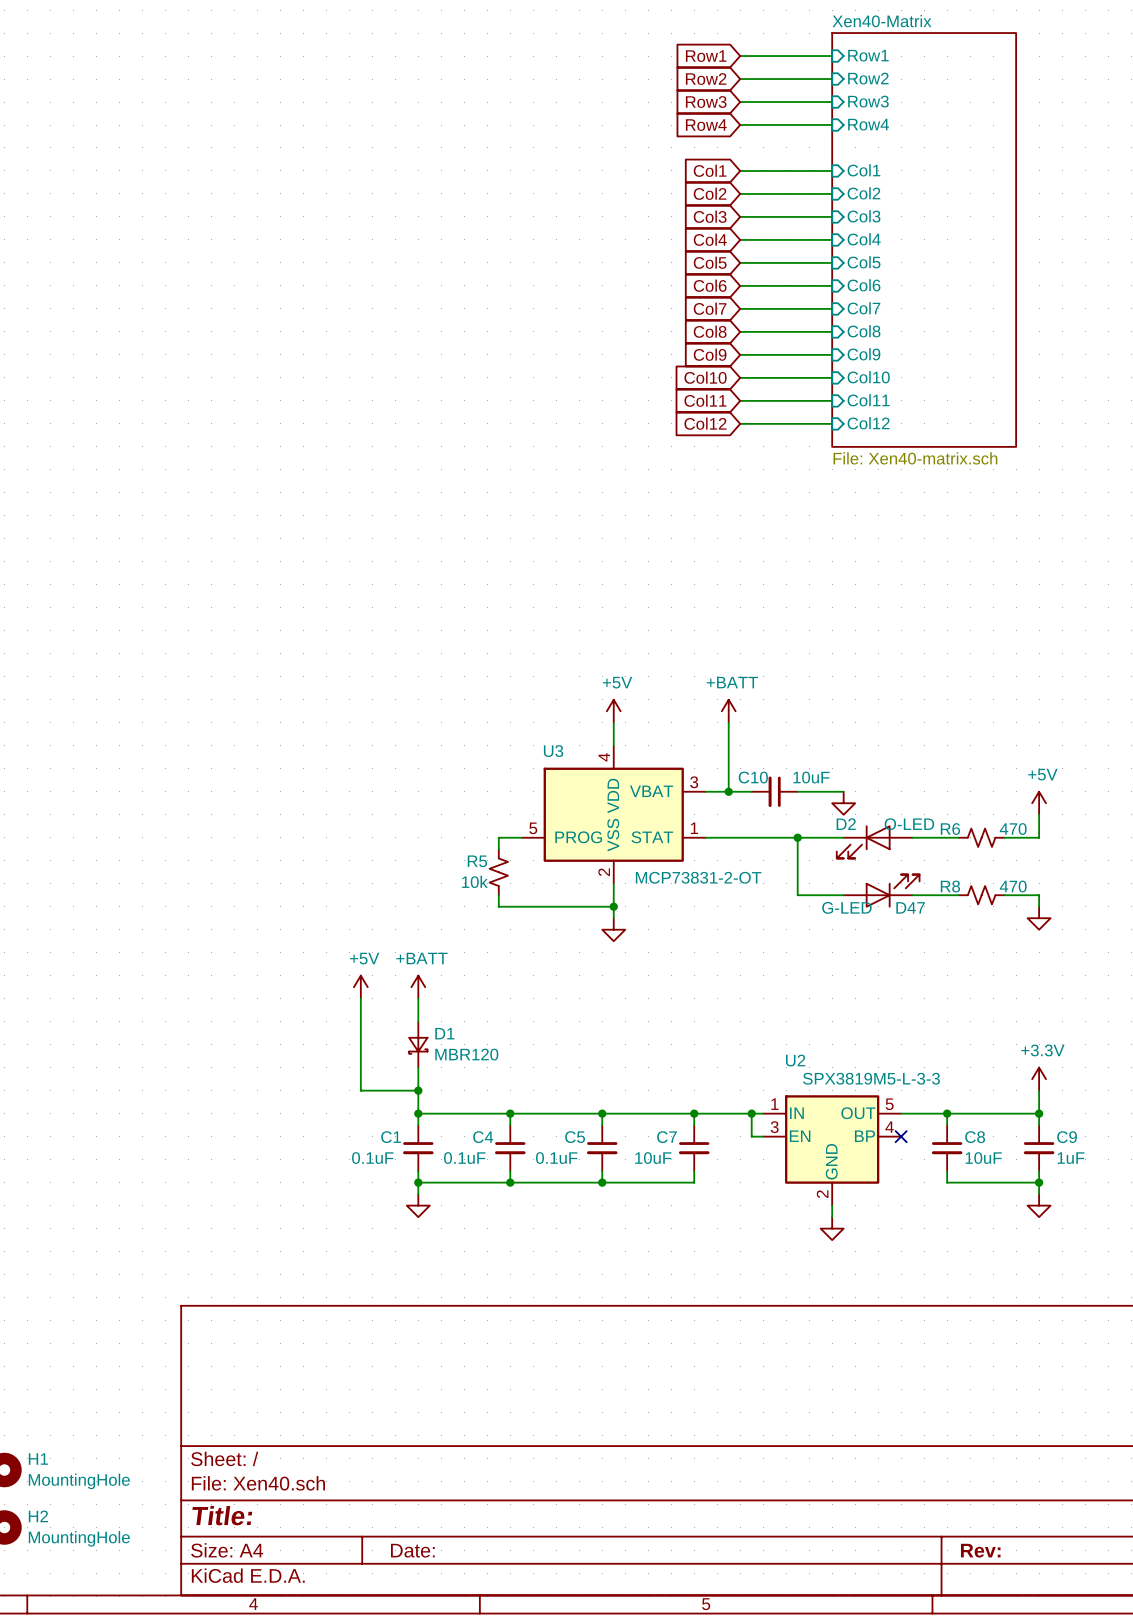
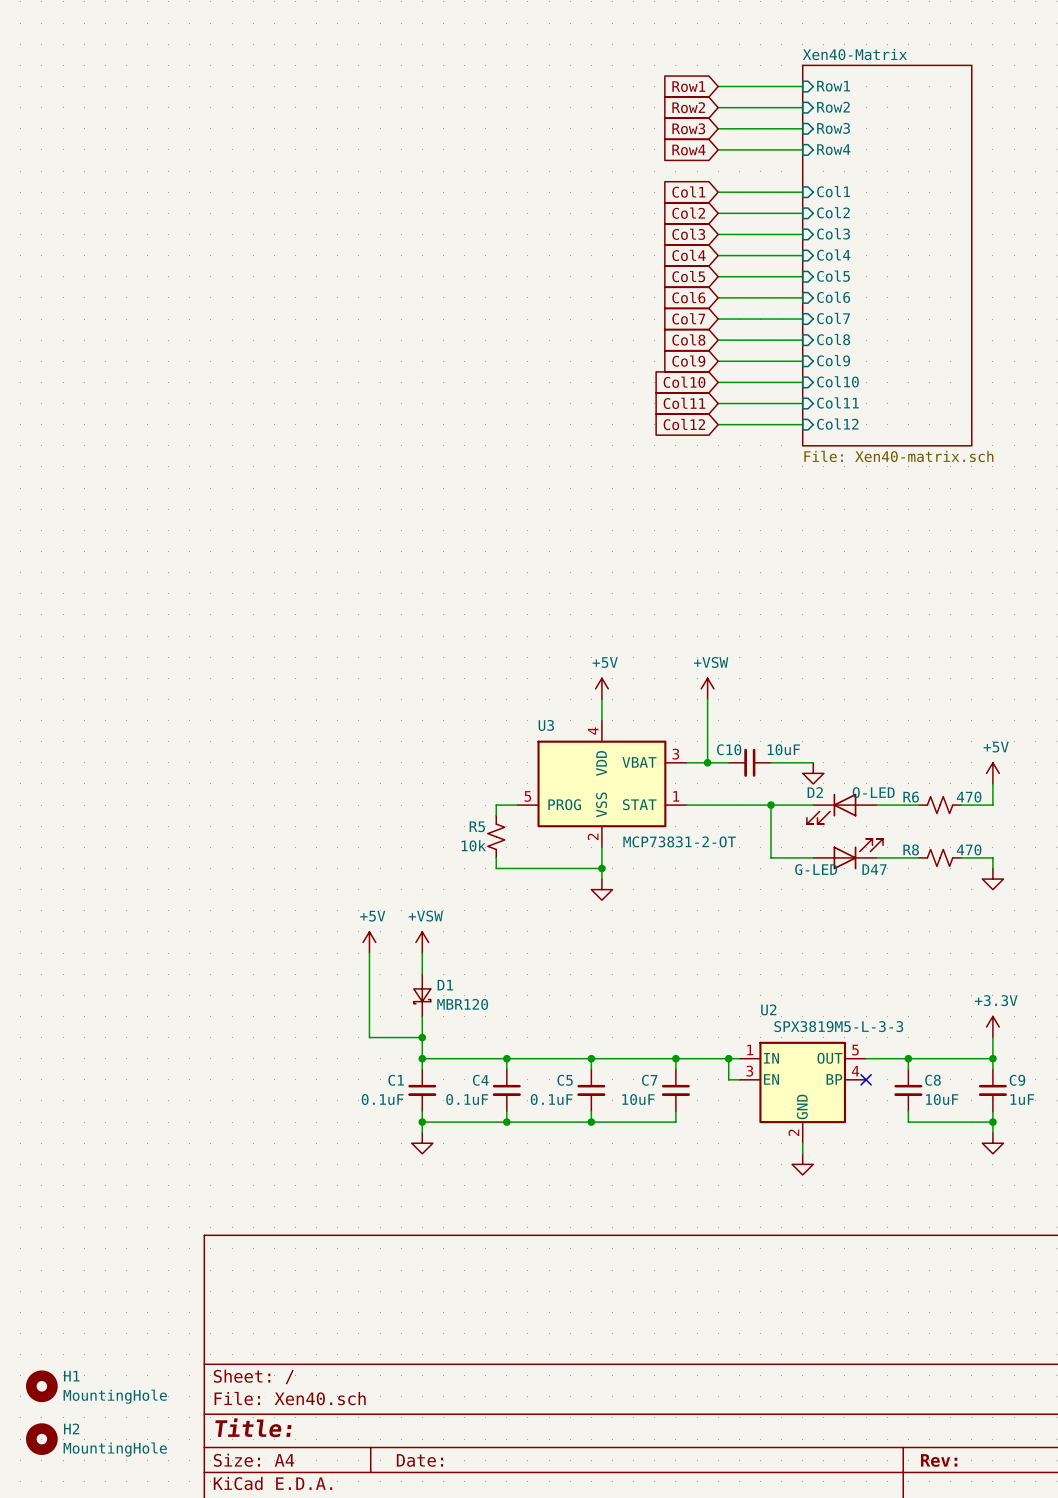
power symbol: +BATT (728, 711) -> +VSW (707, 688)
power symbol: +BATT (418, 987) -> +VSW (422, 942)

